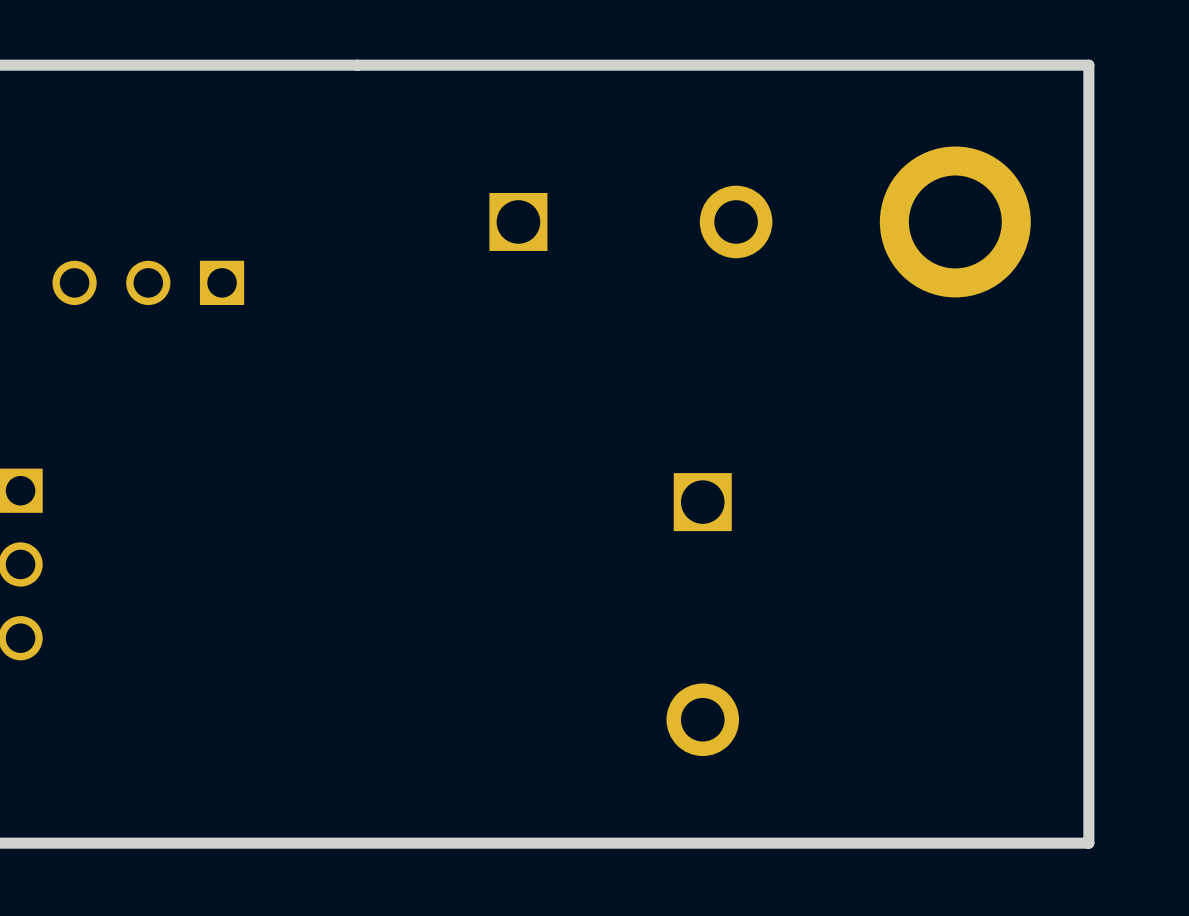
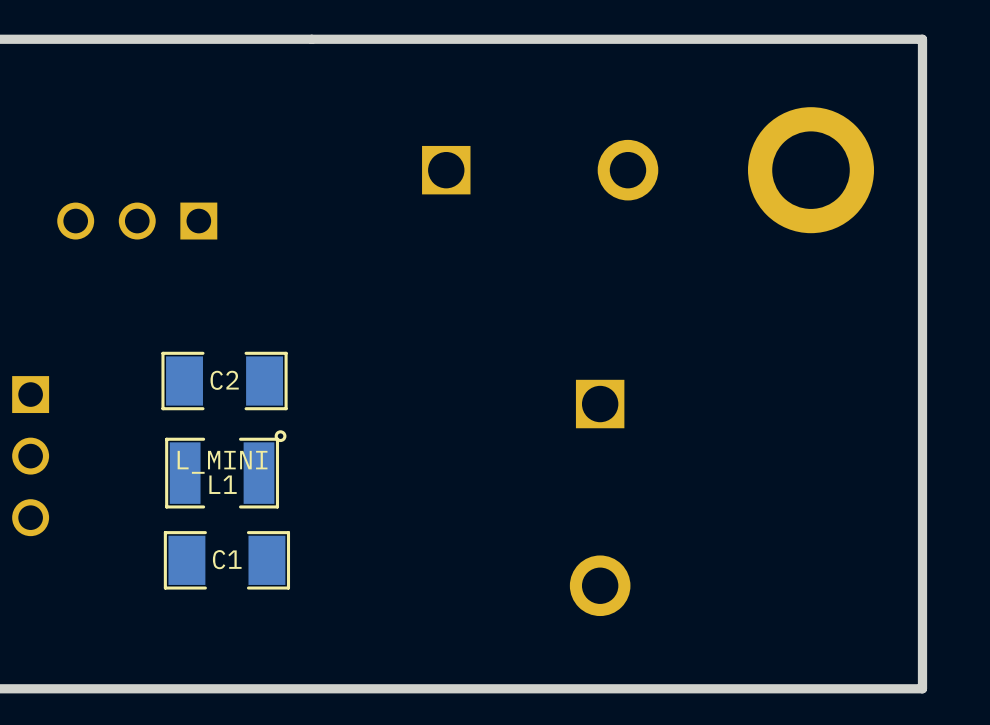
C2: none -> (224, 381)
L1: none -> L_MINI (225, 469)
C1: none -> (226, 560)

